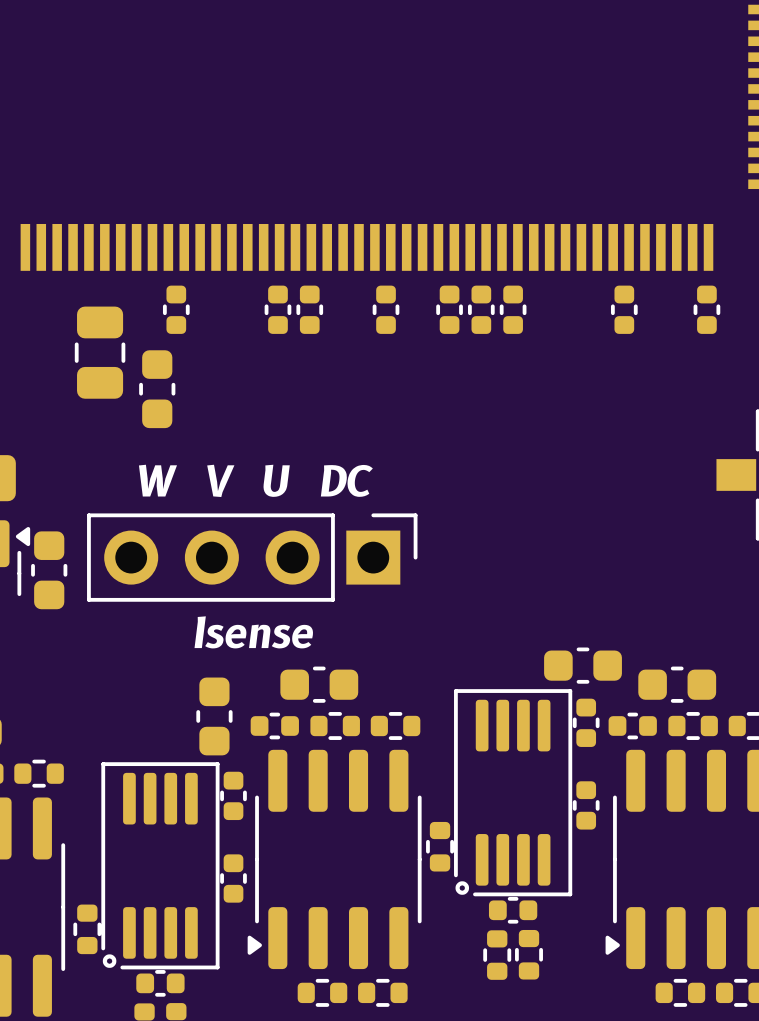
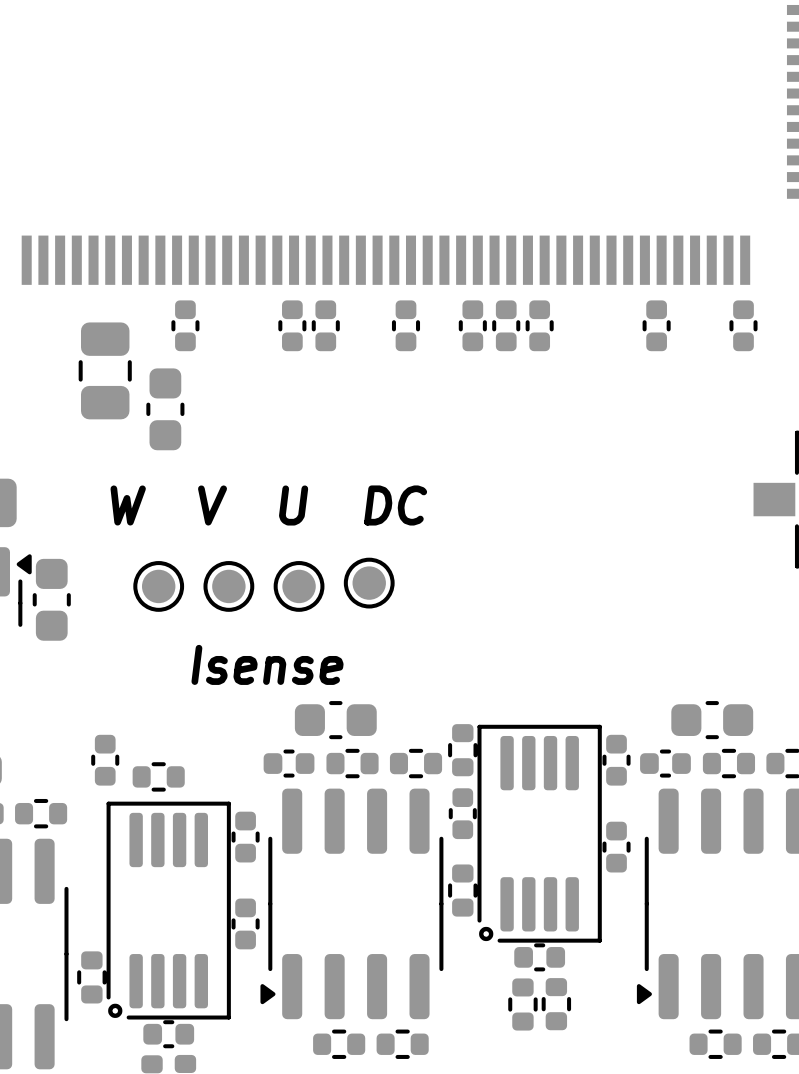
part: none -> (369, 583)
part: none -> (158, 586)
part: none -> (228, 586)
part: (252, 557) -> none
part: none -> (299, 586)
part: (583, 665) -> none
part: none -> (462, 750)
part: (214, 716) -> none
part: none -> (105, 760)
part: none -> (158, 776)
part: none -> (462, 813)

